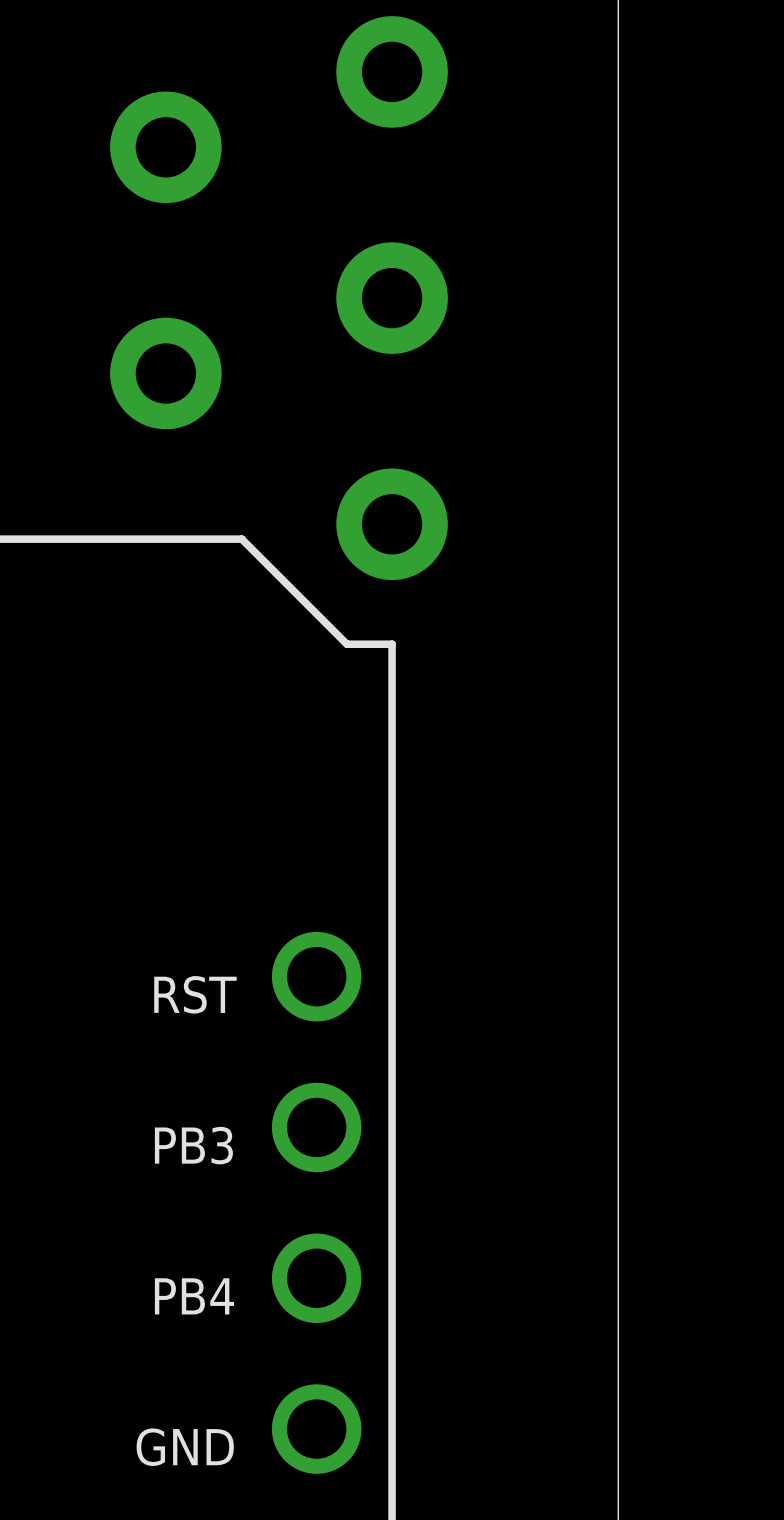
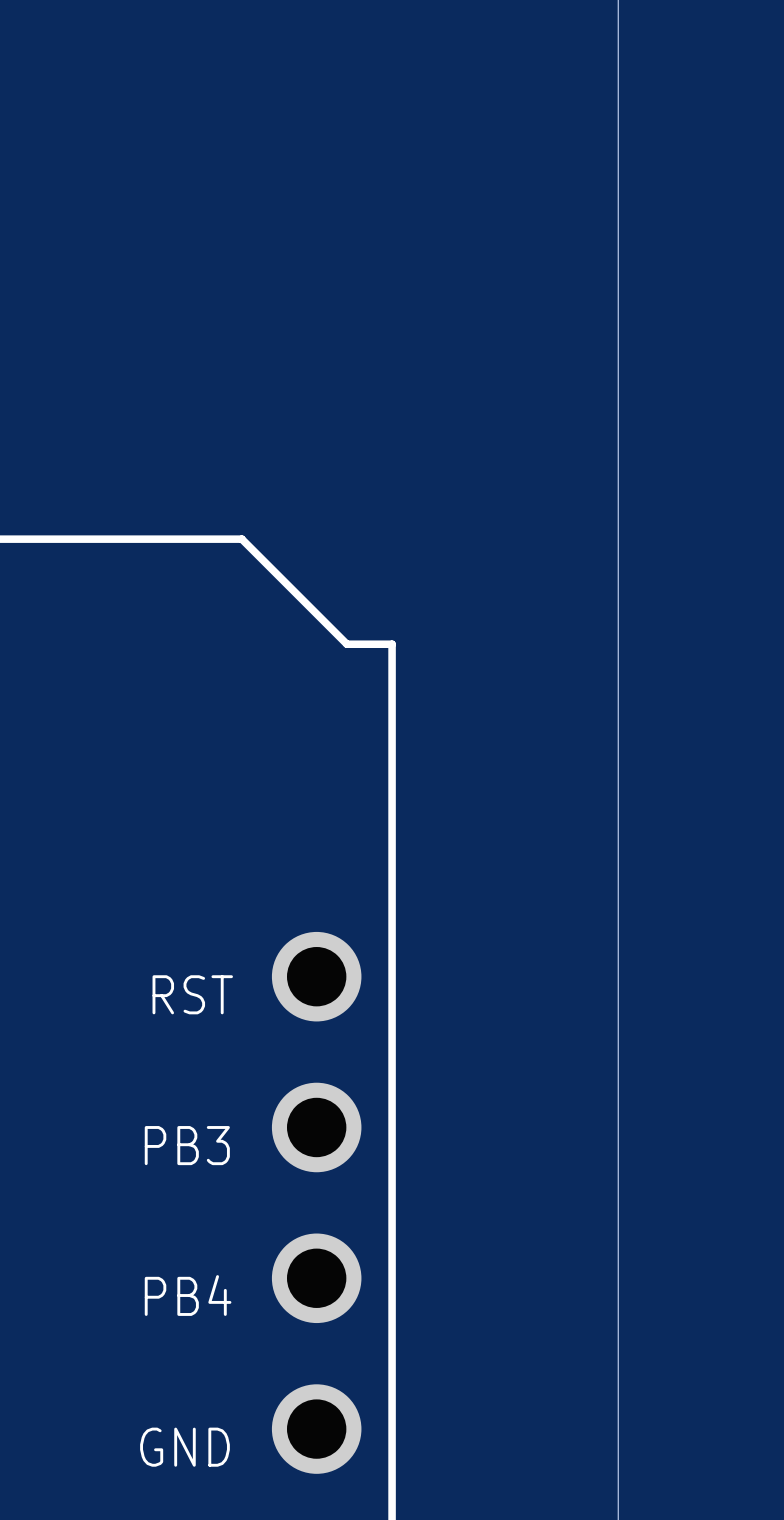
part: (392, 71) -> none
part: (165, 147) -> none
part: (392, 298) -> none
part: (165, 373) -> none
part: (392, 524) -> none

